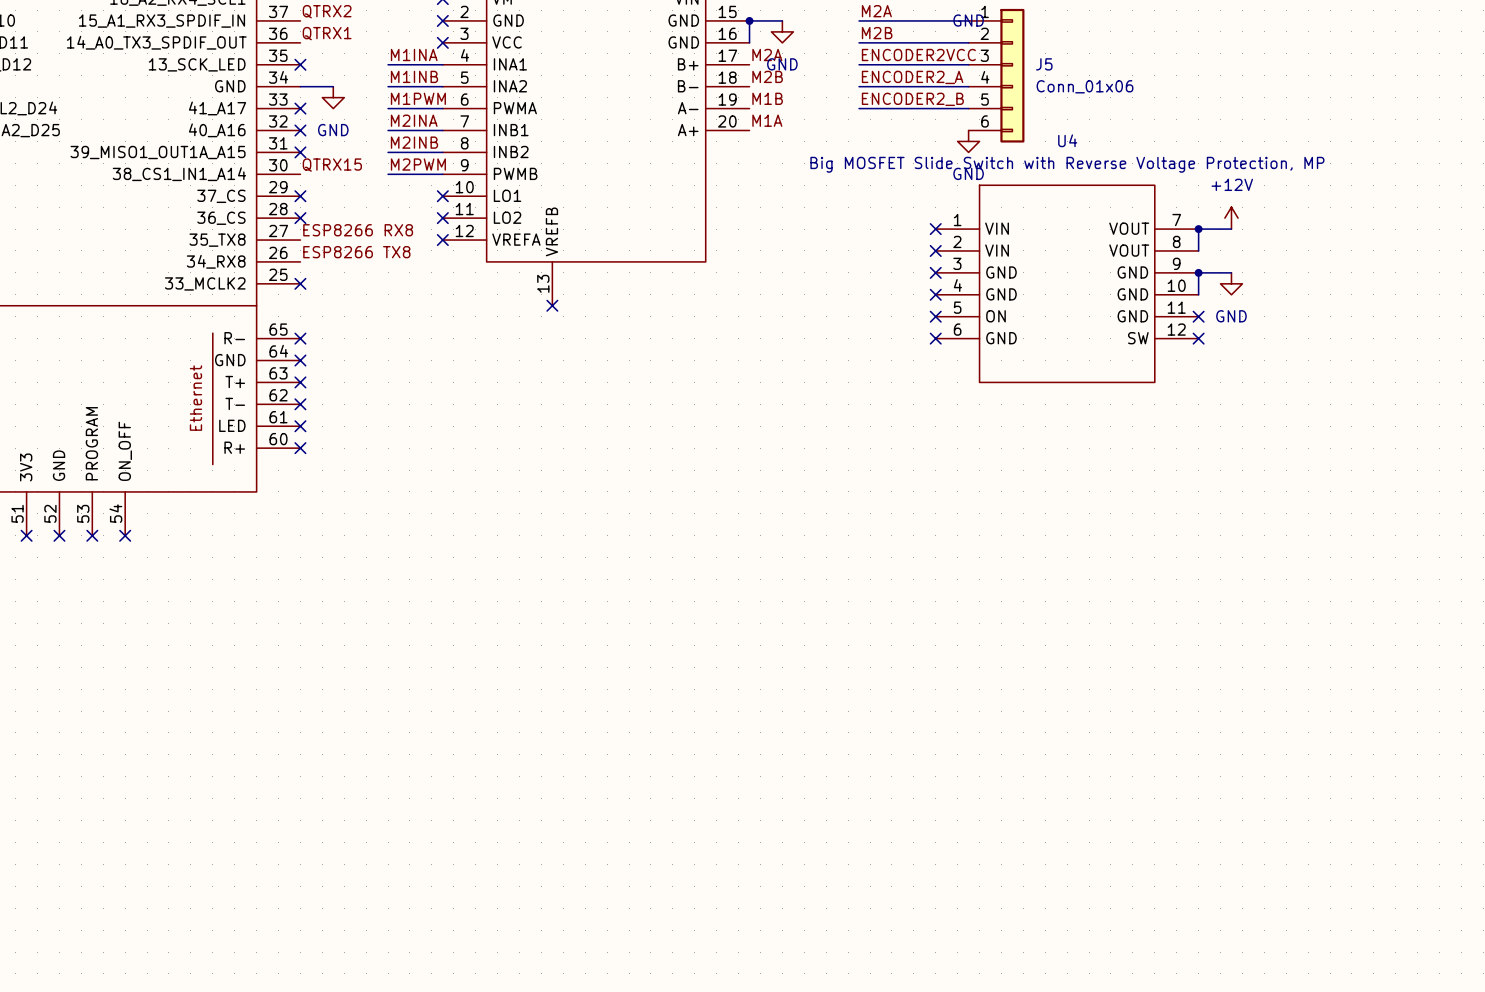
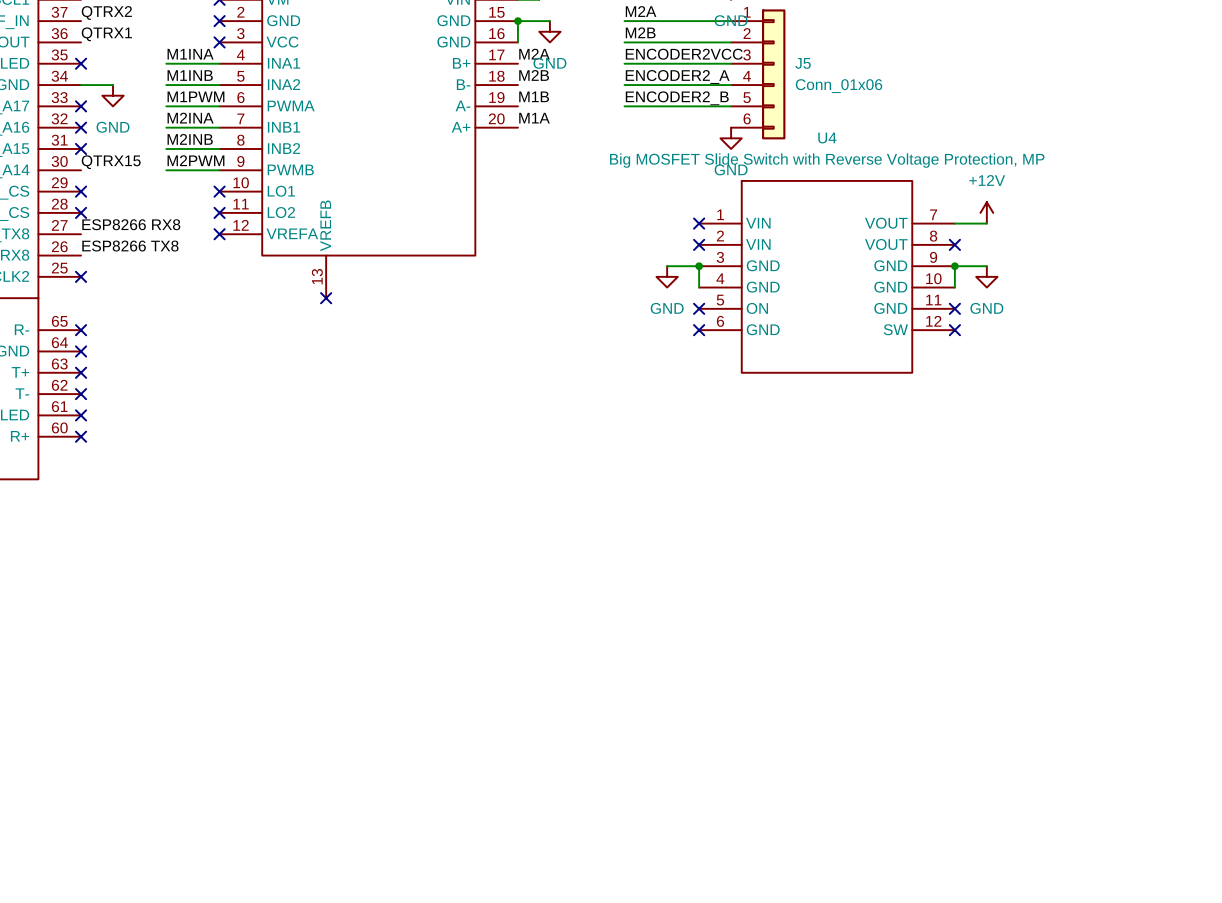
wire: (1198, 229) (1198, 250) -> none
junction: (1198, 229) -> none
no-connect mark: none -> (954, 244)
wire: none -> (667, 266) (699, 266) (699, 287)
junction: none -> (699, 266)
no-connect mark: (935, 272) -> none
power symbol: none -> GND (667, 276)
no-connect mark: (935, 294) -> none

